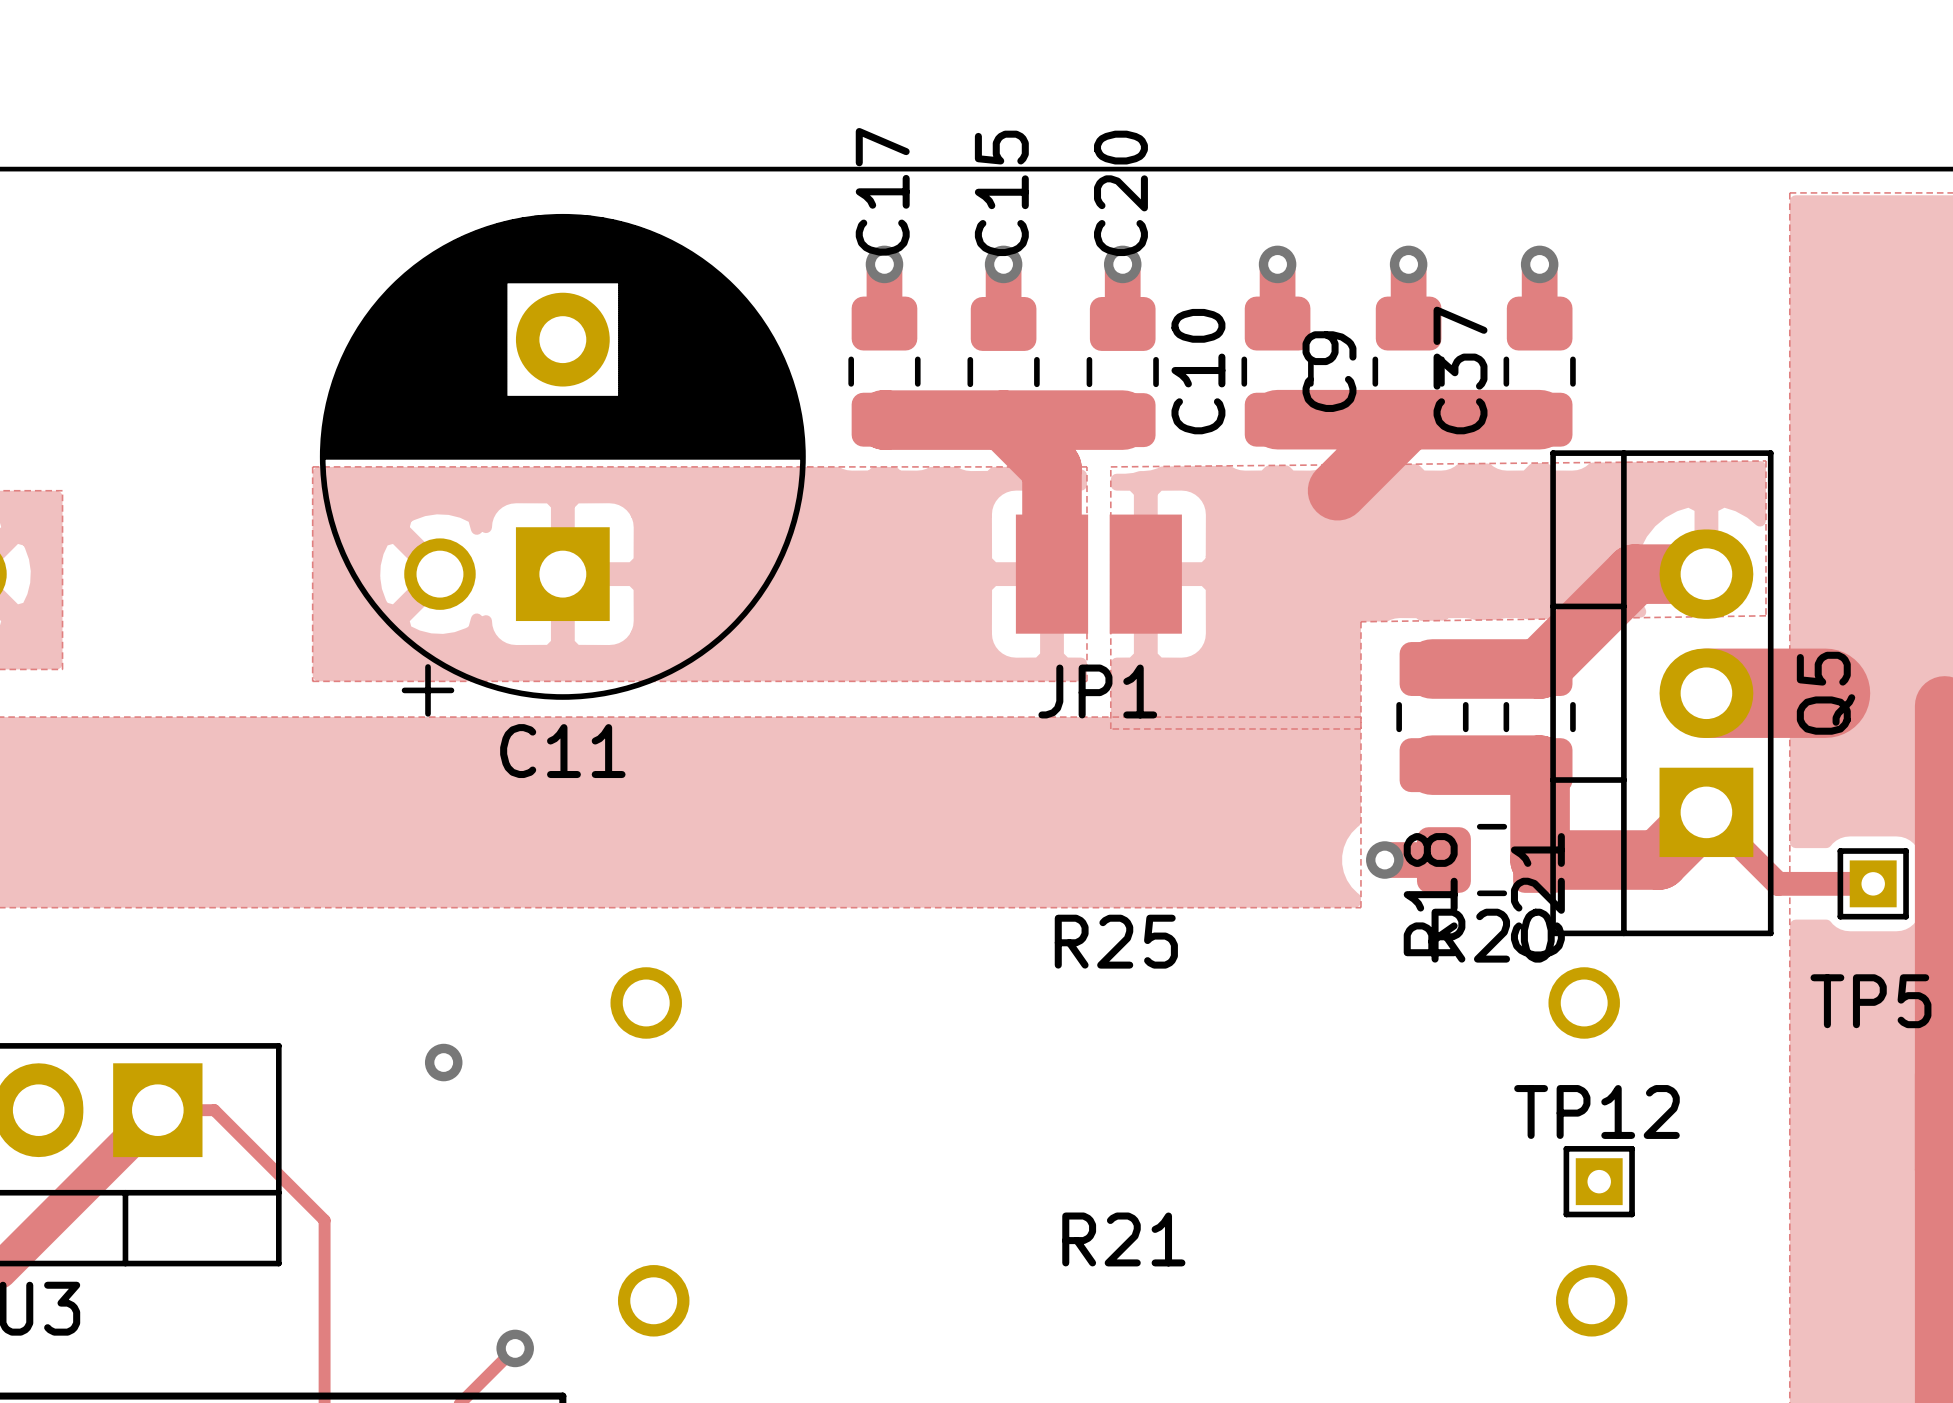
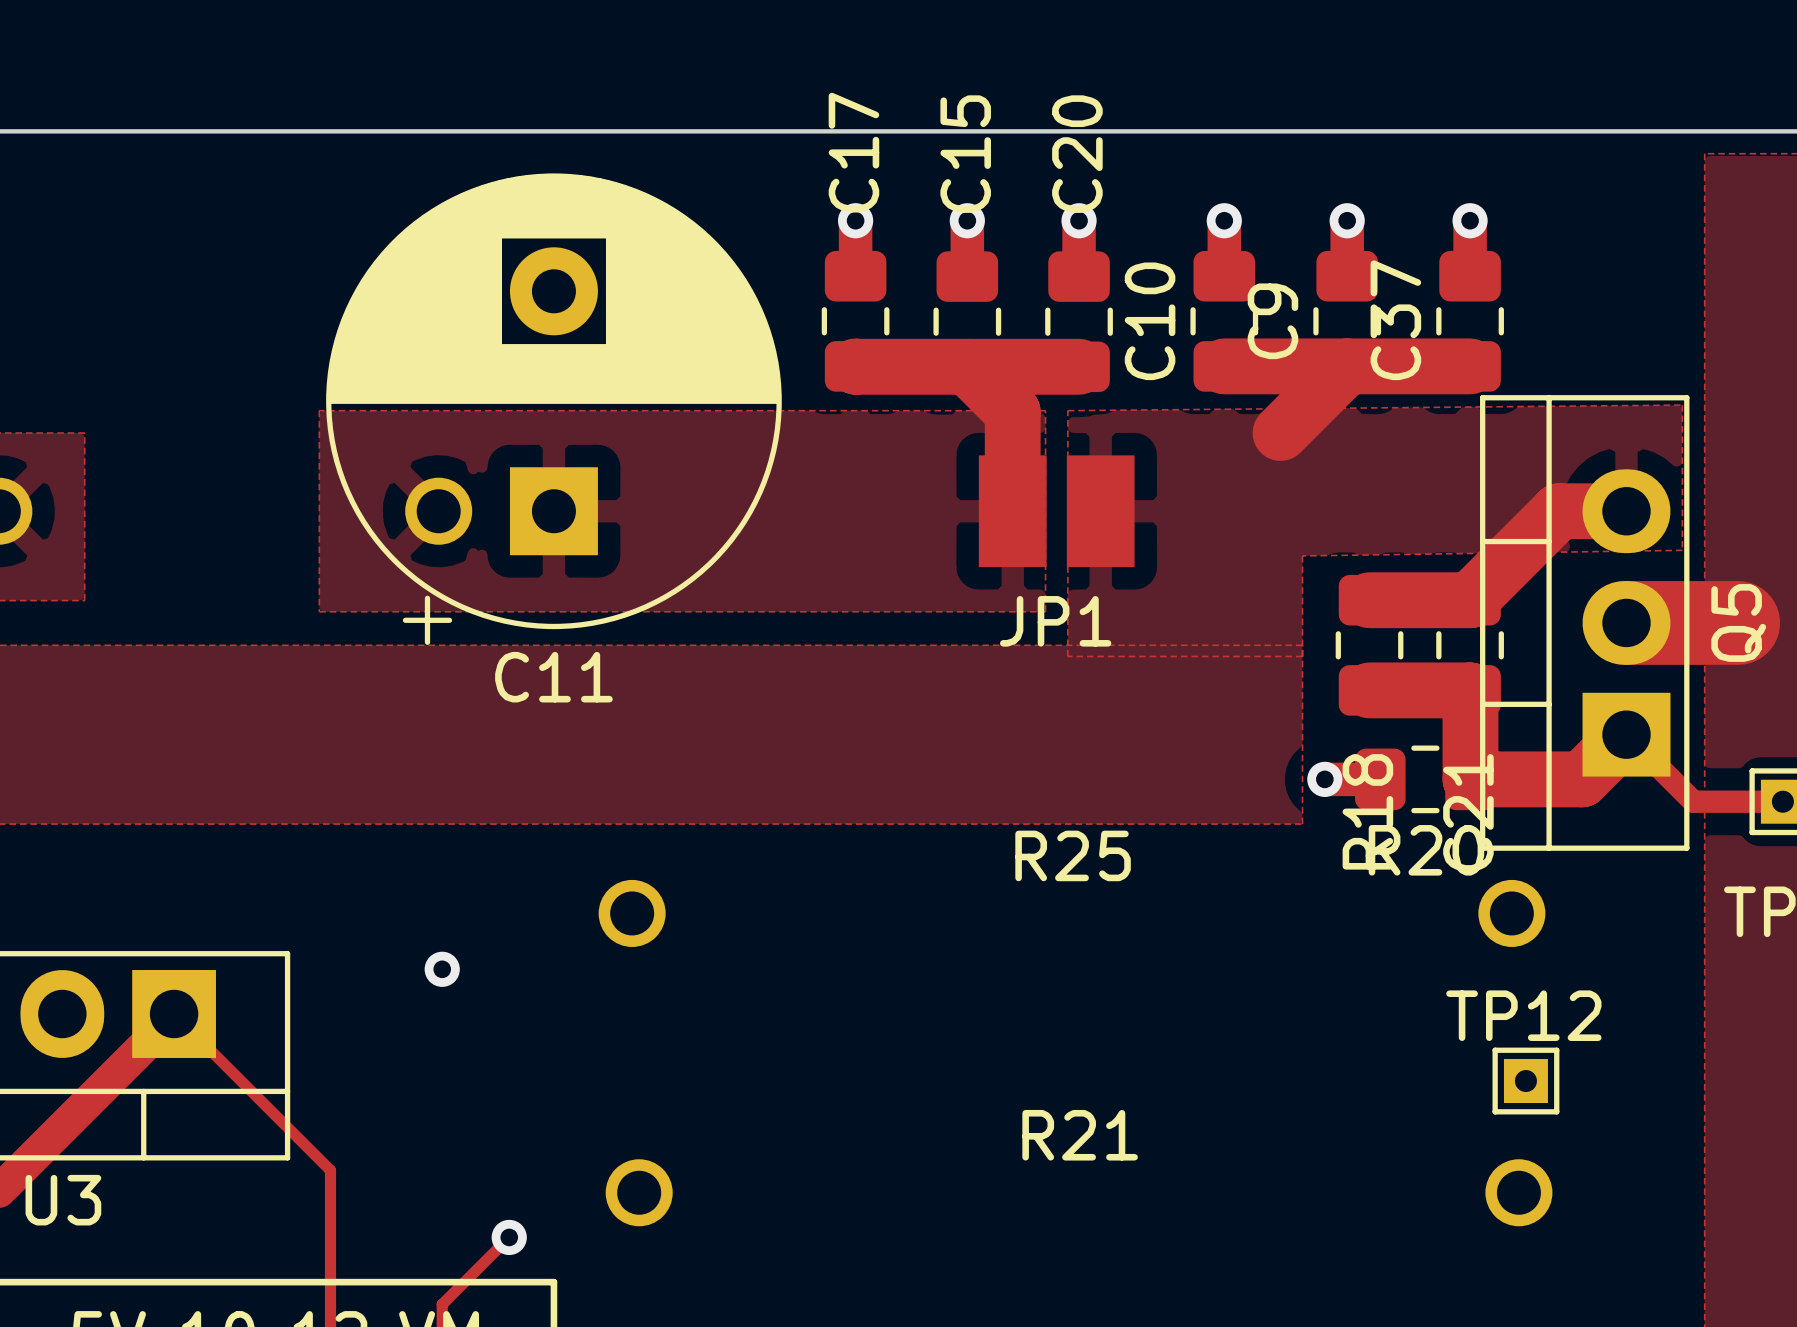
track: (157, 1110) (214, 1110) (324, 1220) (324, 1276) -> (174, 1013) (330, 1170)

